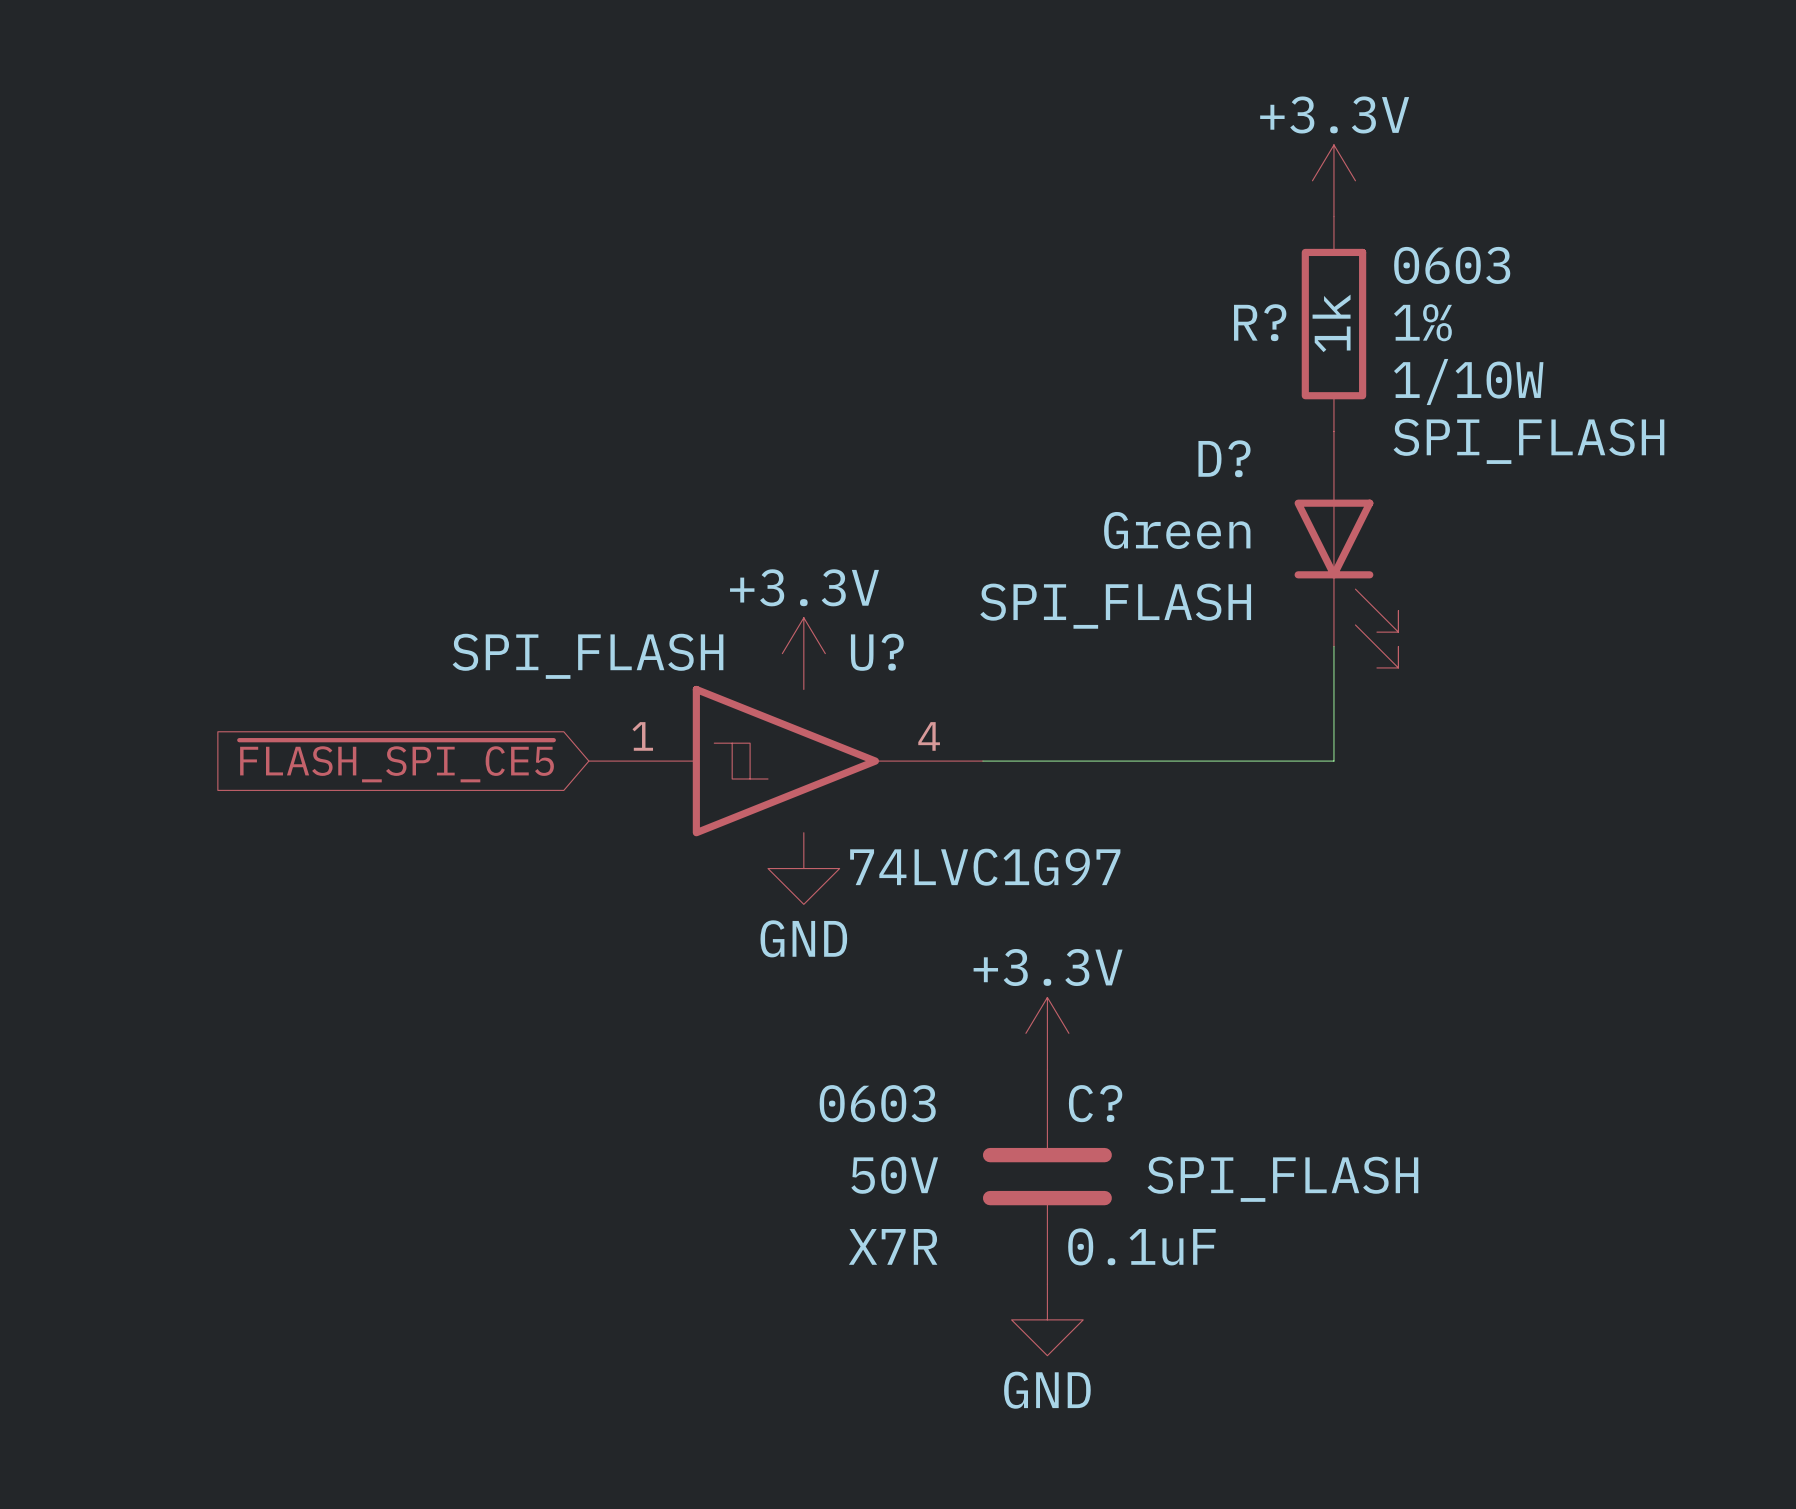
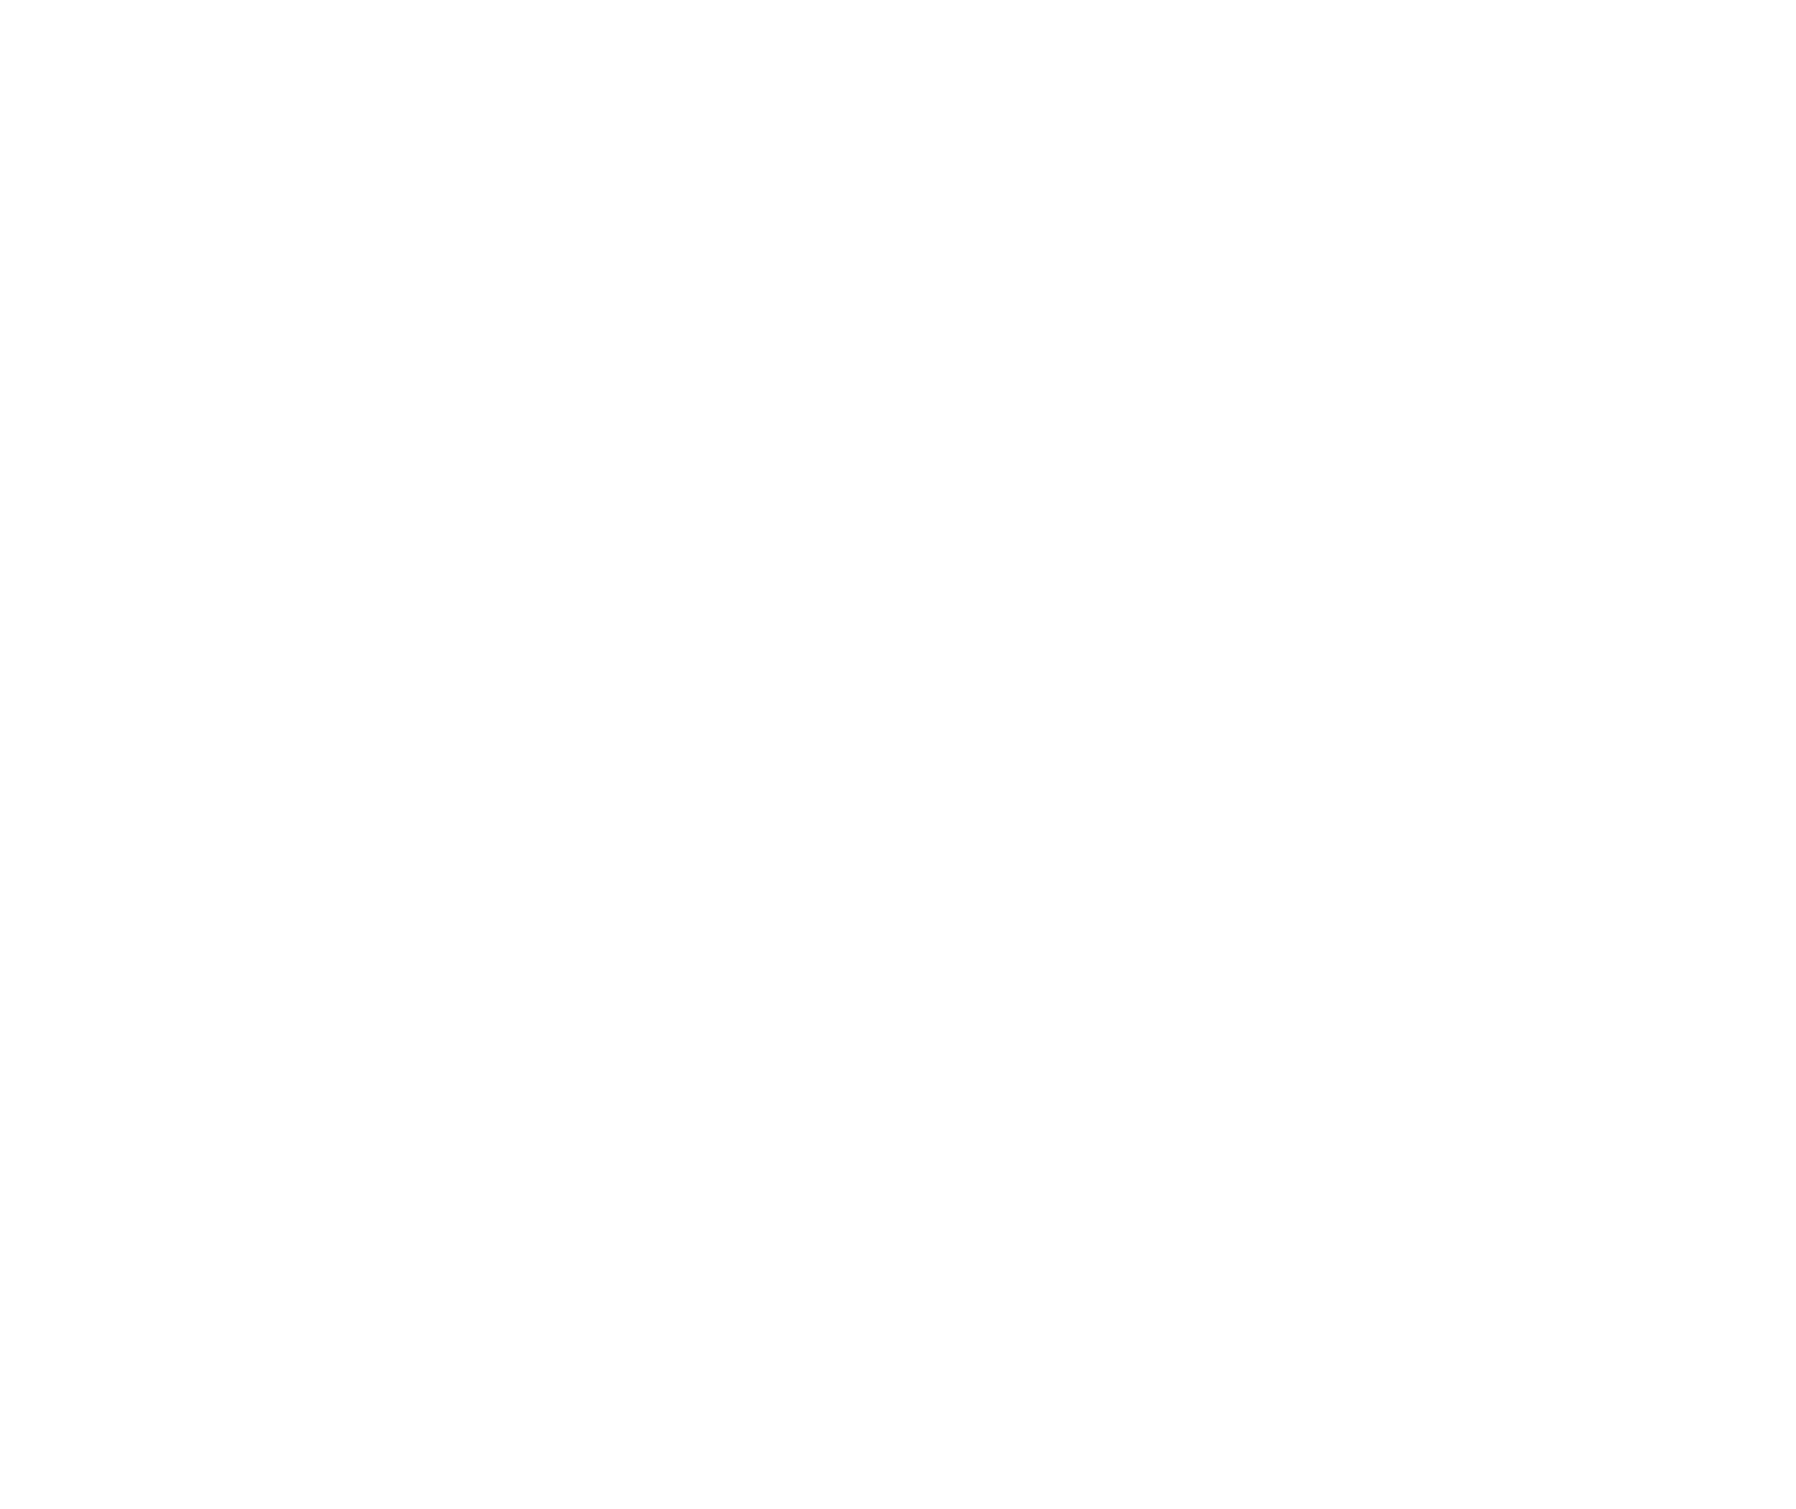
power symbol: +3.3V (1333, 180) -> none
R?: 1k (1333, 324) -> none
D?: Green (1346, 549) -> none
wire: (1333, 646) (1333, 761) (982, 761) -> none
power symbol: +3.3V (803, 653) -> none
global label: ~{FLASH_SPI_CE5} (396, 761) -> none
U?: 74LVC1G97 (785, 761) -> none
power symbol: GND (803, 868) -> none
power symbol: +3.3V (1047, 1033) -> none
C?: 0.1uF (1047, 1176) -> none
power symbol: GND (1047, 1319) -> none

